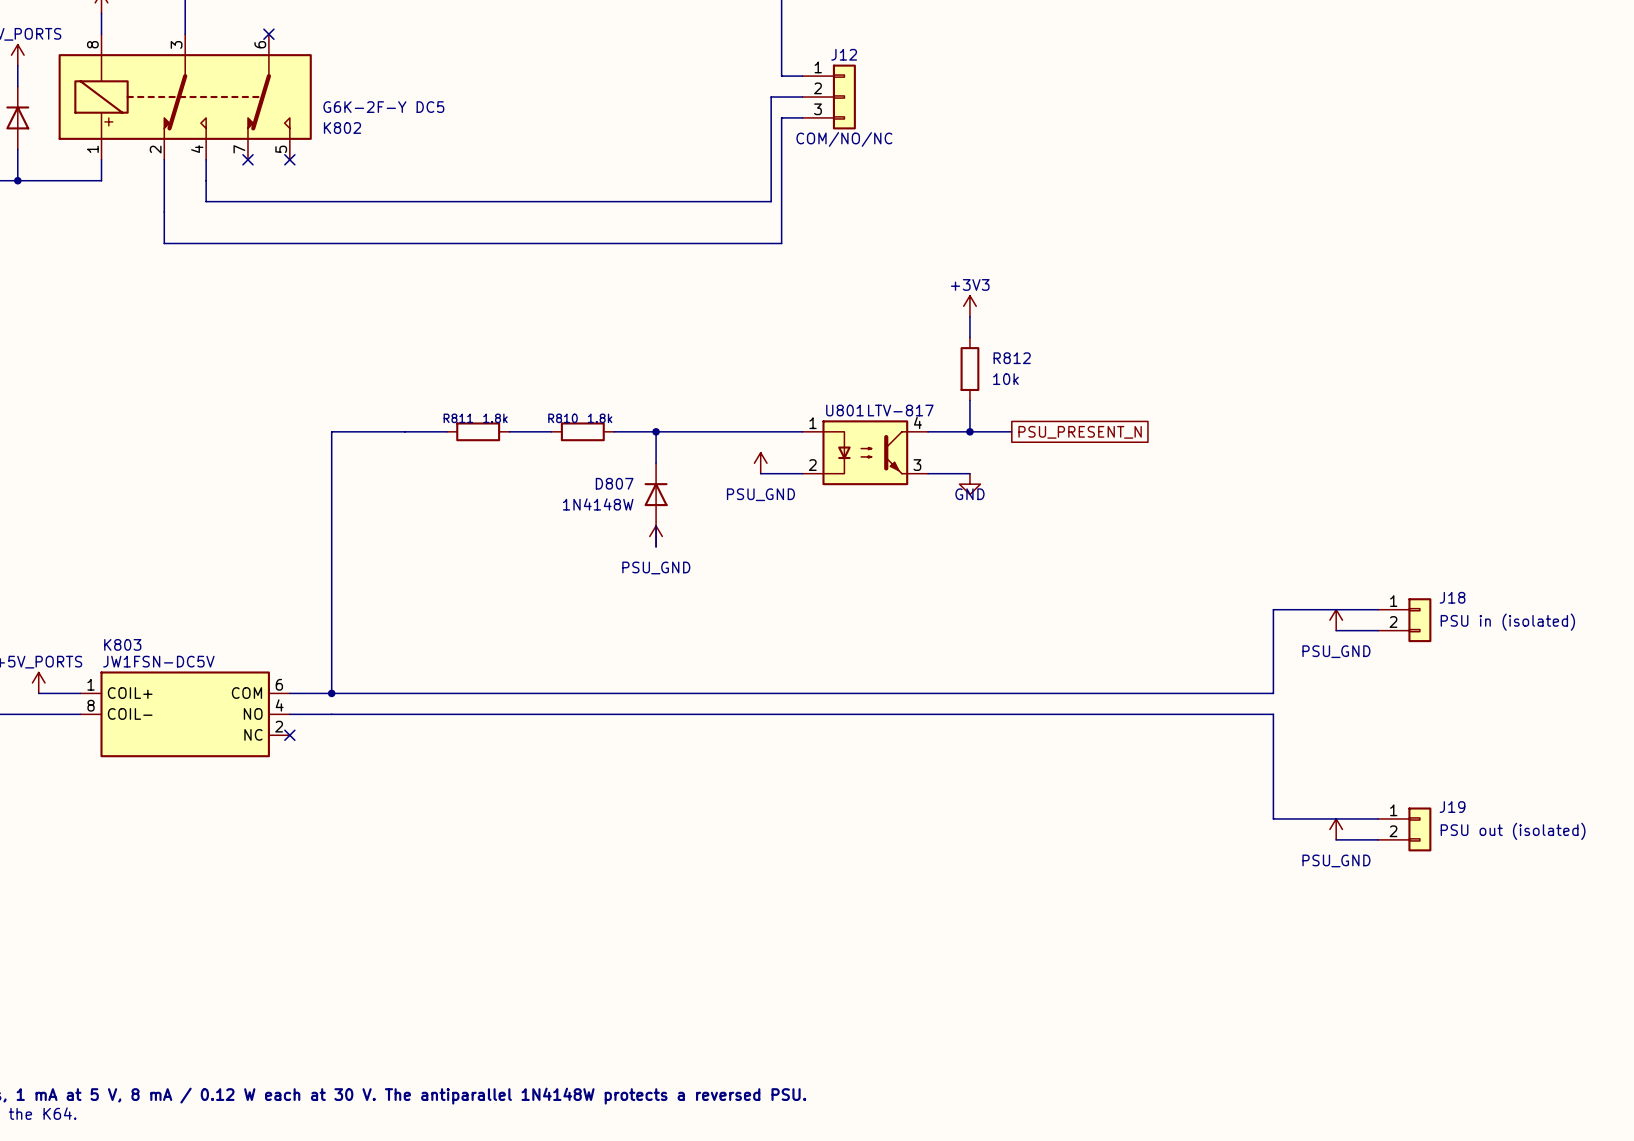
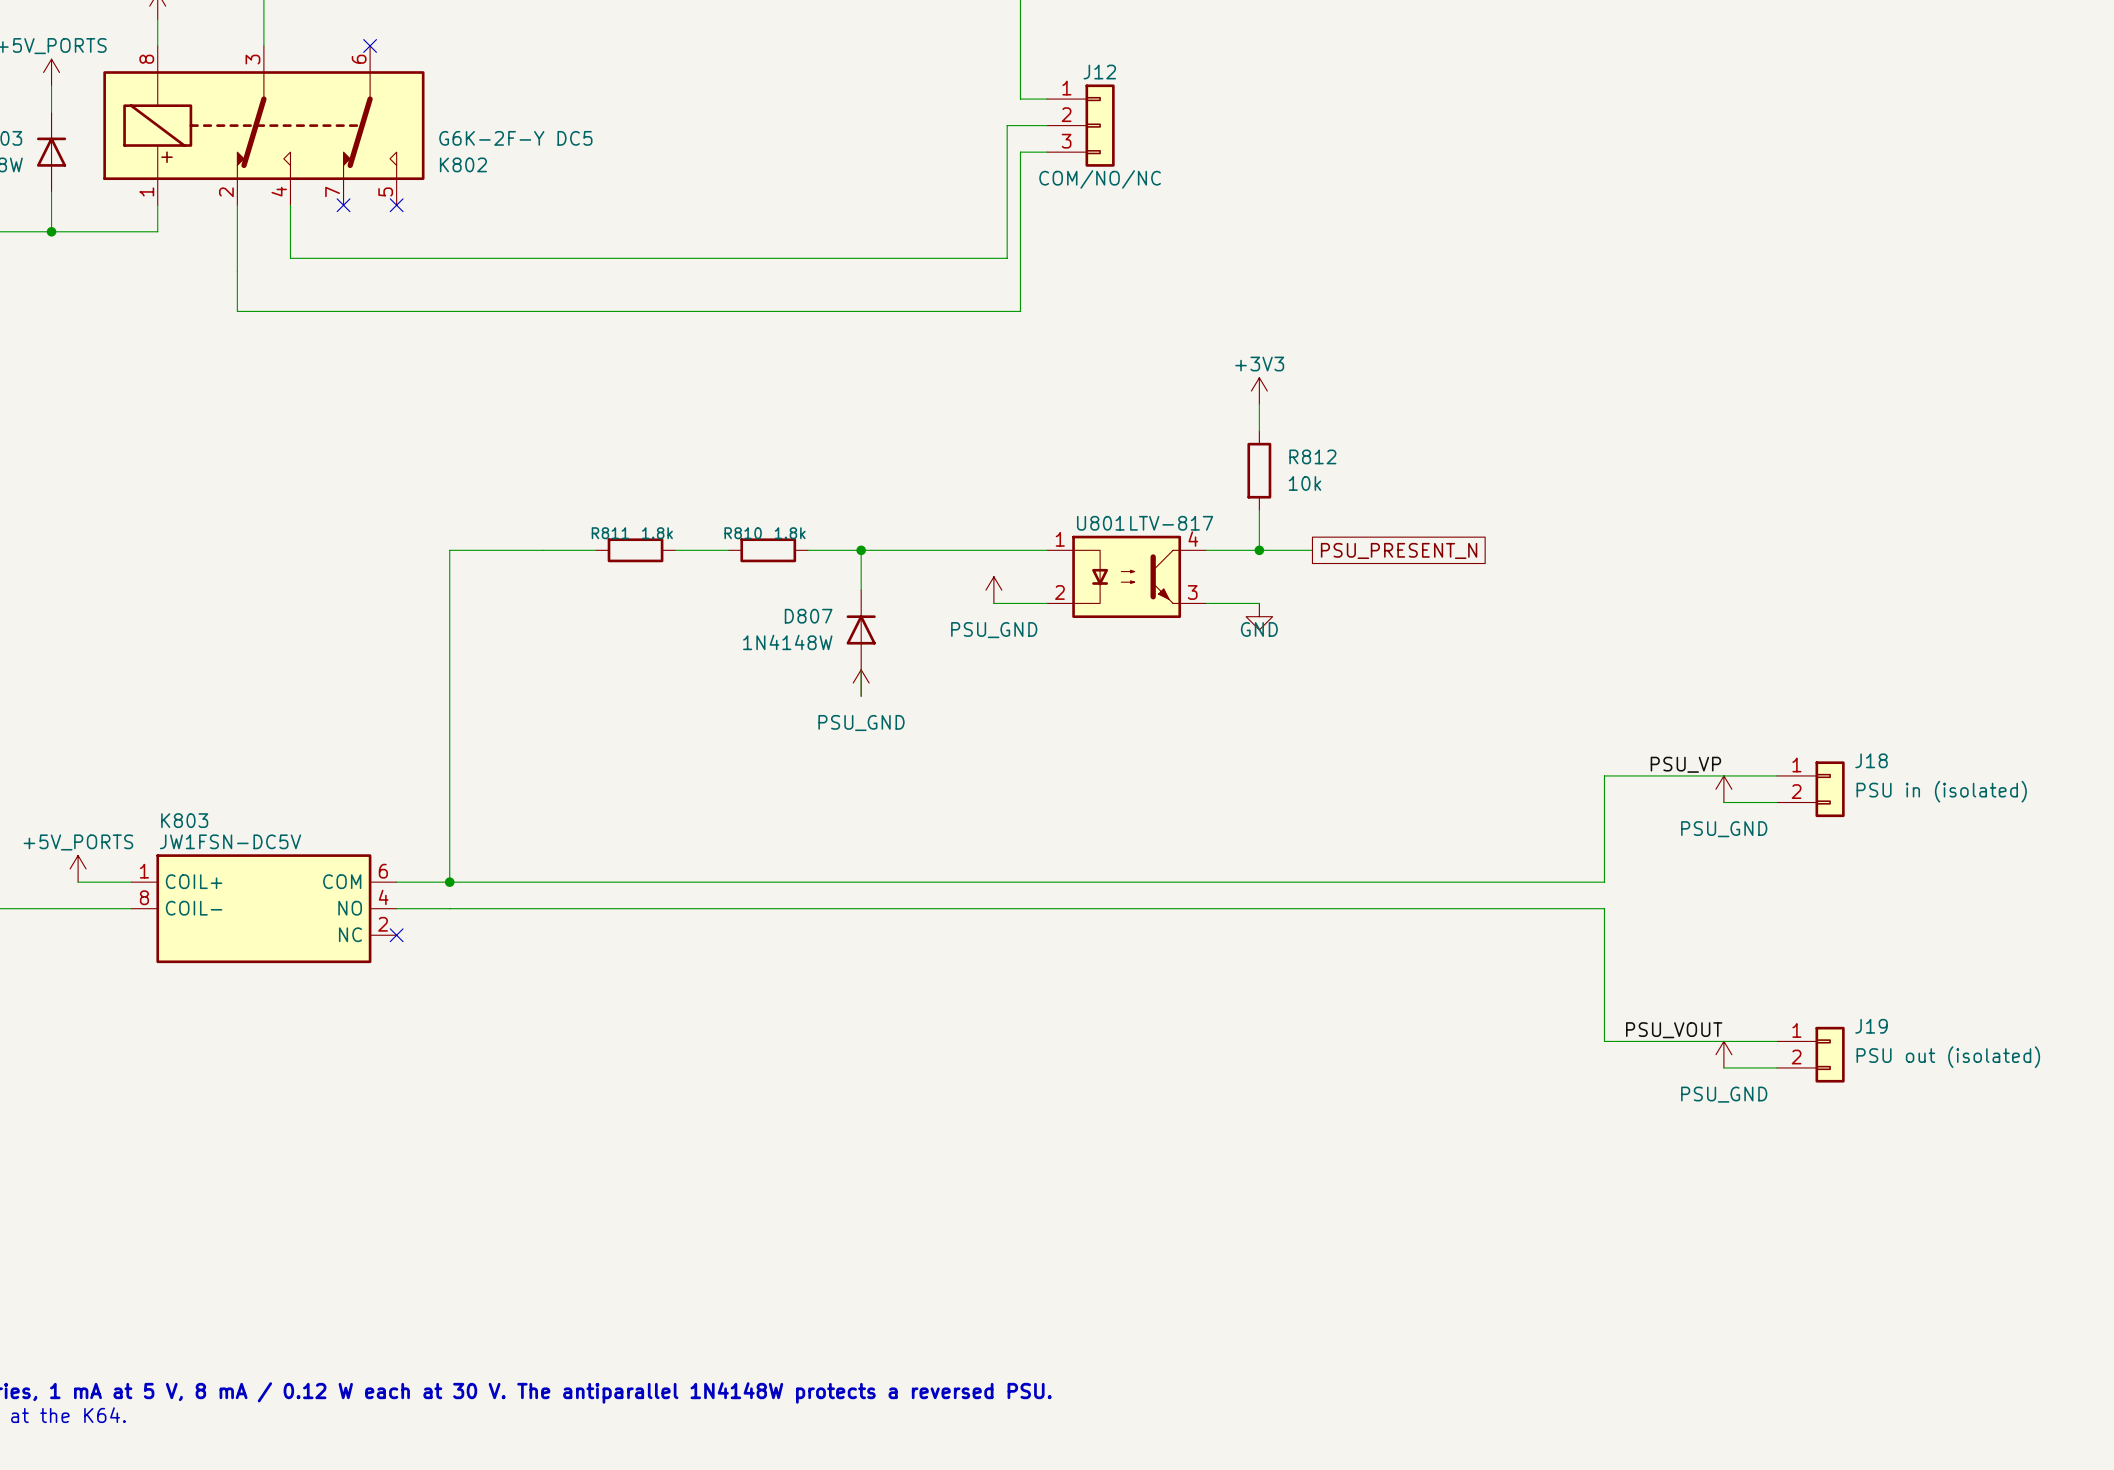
label: none -> PSU_VP (1685, 764)
wire: (1273, 609) (1273, 693) (1242, 693) -> (1644, 775) (1604, 775) (1604, 882)
wire: (1242, 714) (1273, 714) (1273, 818) -> (1604, 908) (1604, 1041) (1644, 1041)
label: none -> PSU_VOUT (1674, 1030)

